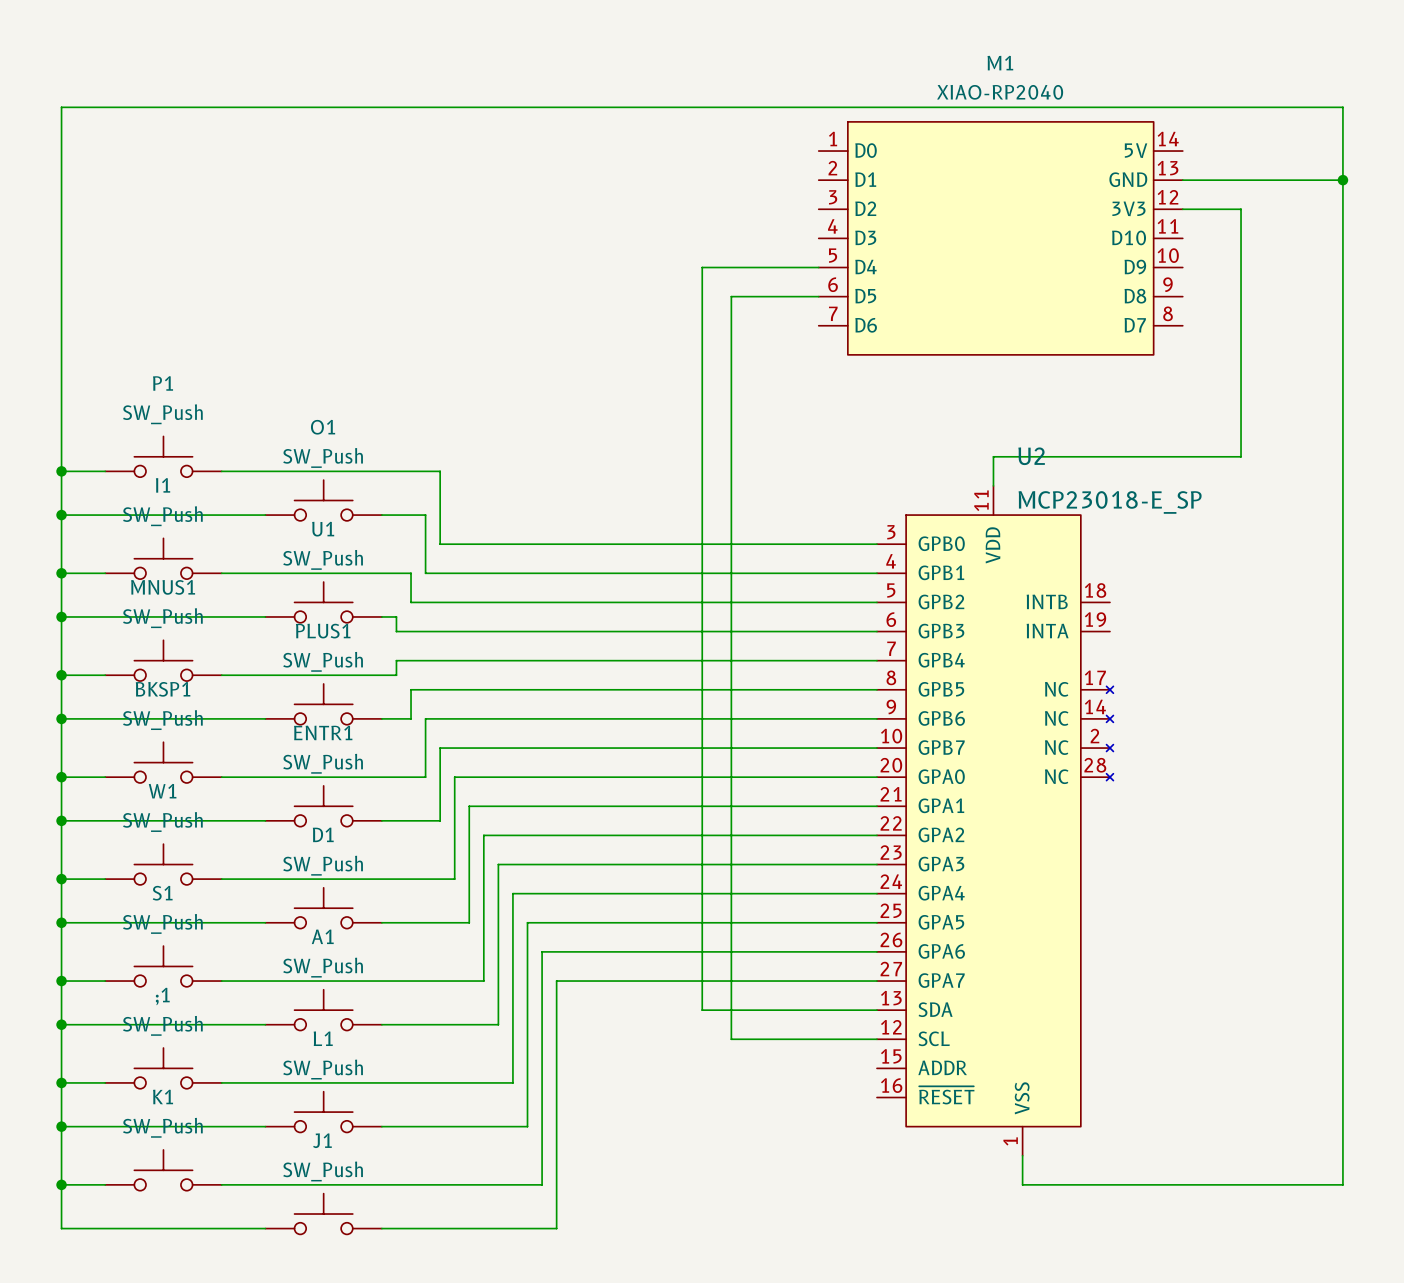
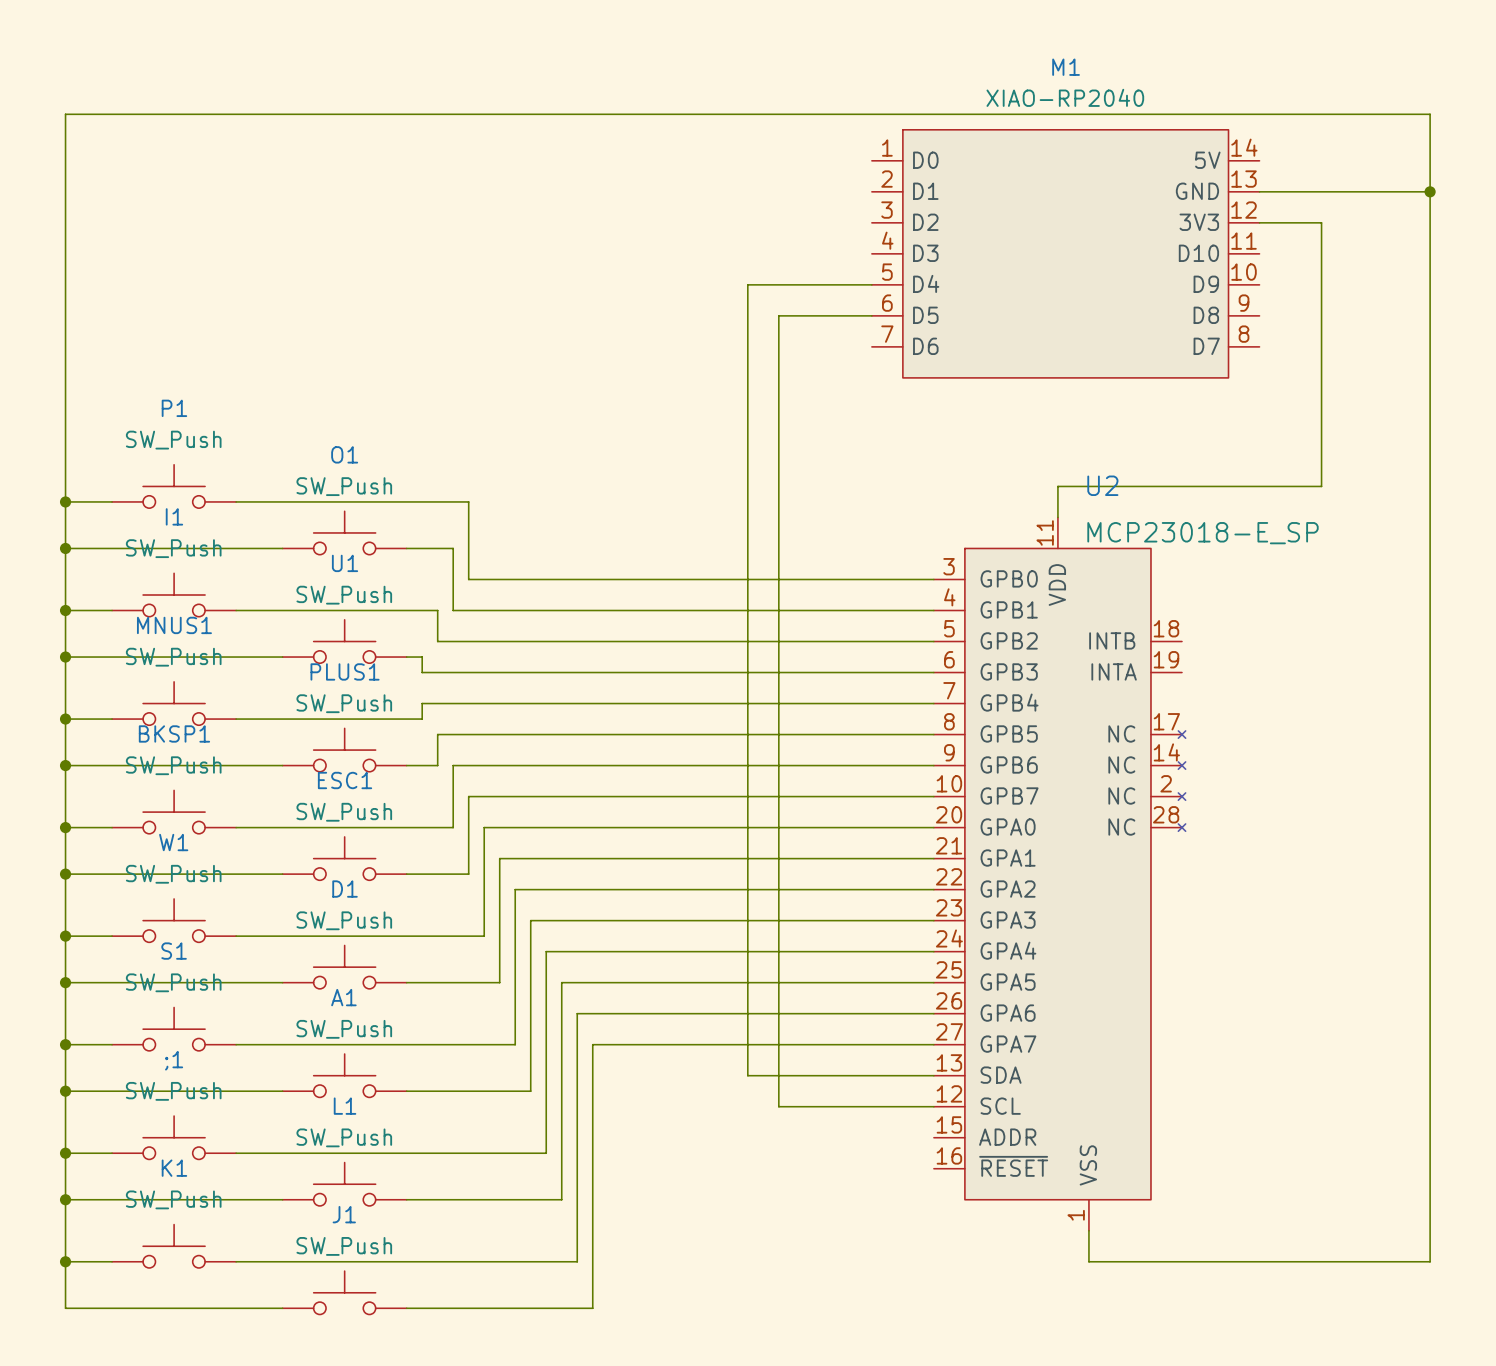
ENTR1 name: ENTR1 (323, 732) -> ESC1 (345, 780)

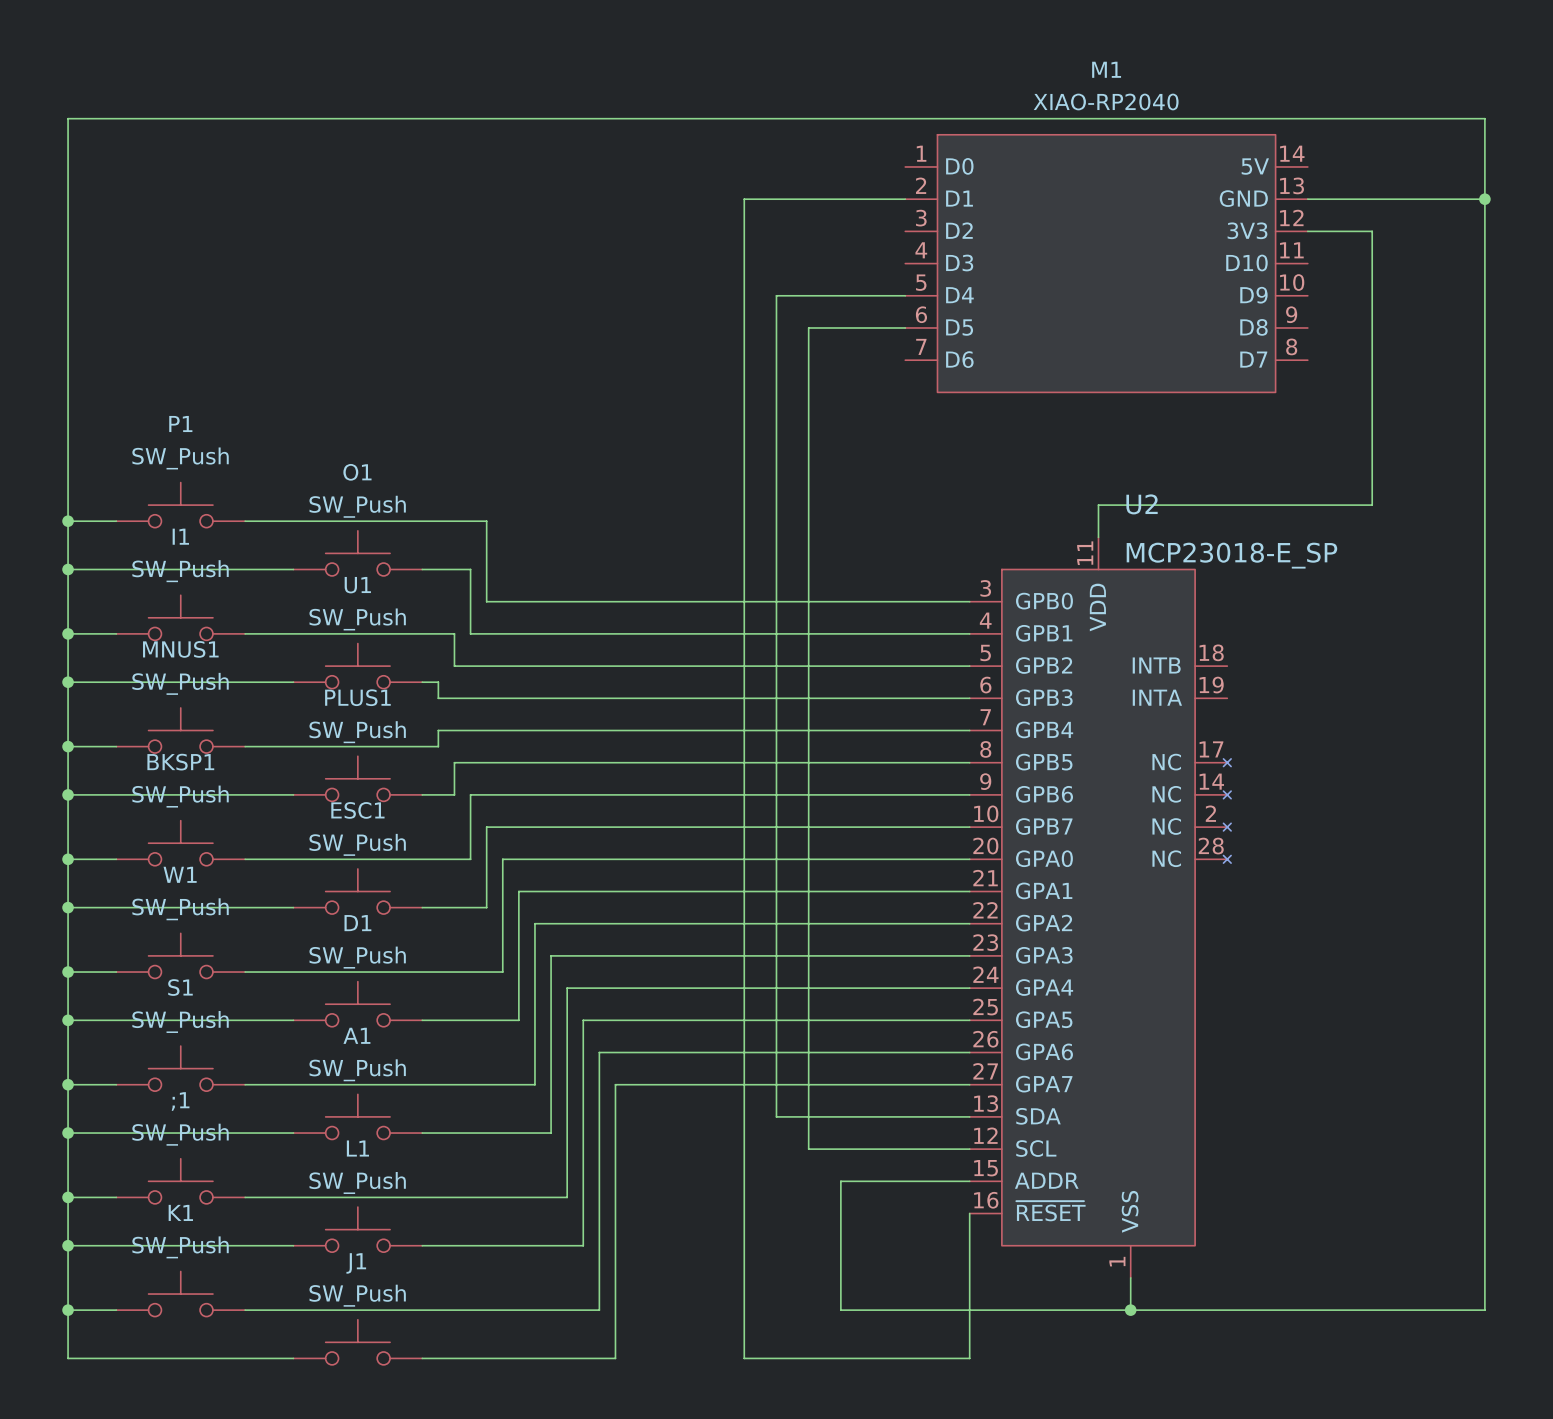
wire: none -> (905, 199) (744, 199) (744, 1358) (969, 1358) (969, 1213)
wire: none -> (969, 1181) (840, 1181) (840, 1310) (1130, 1310)
junction: none -> (1130, 1310)

